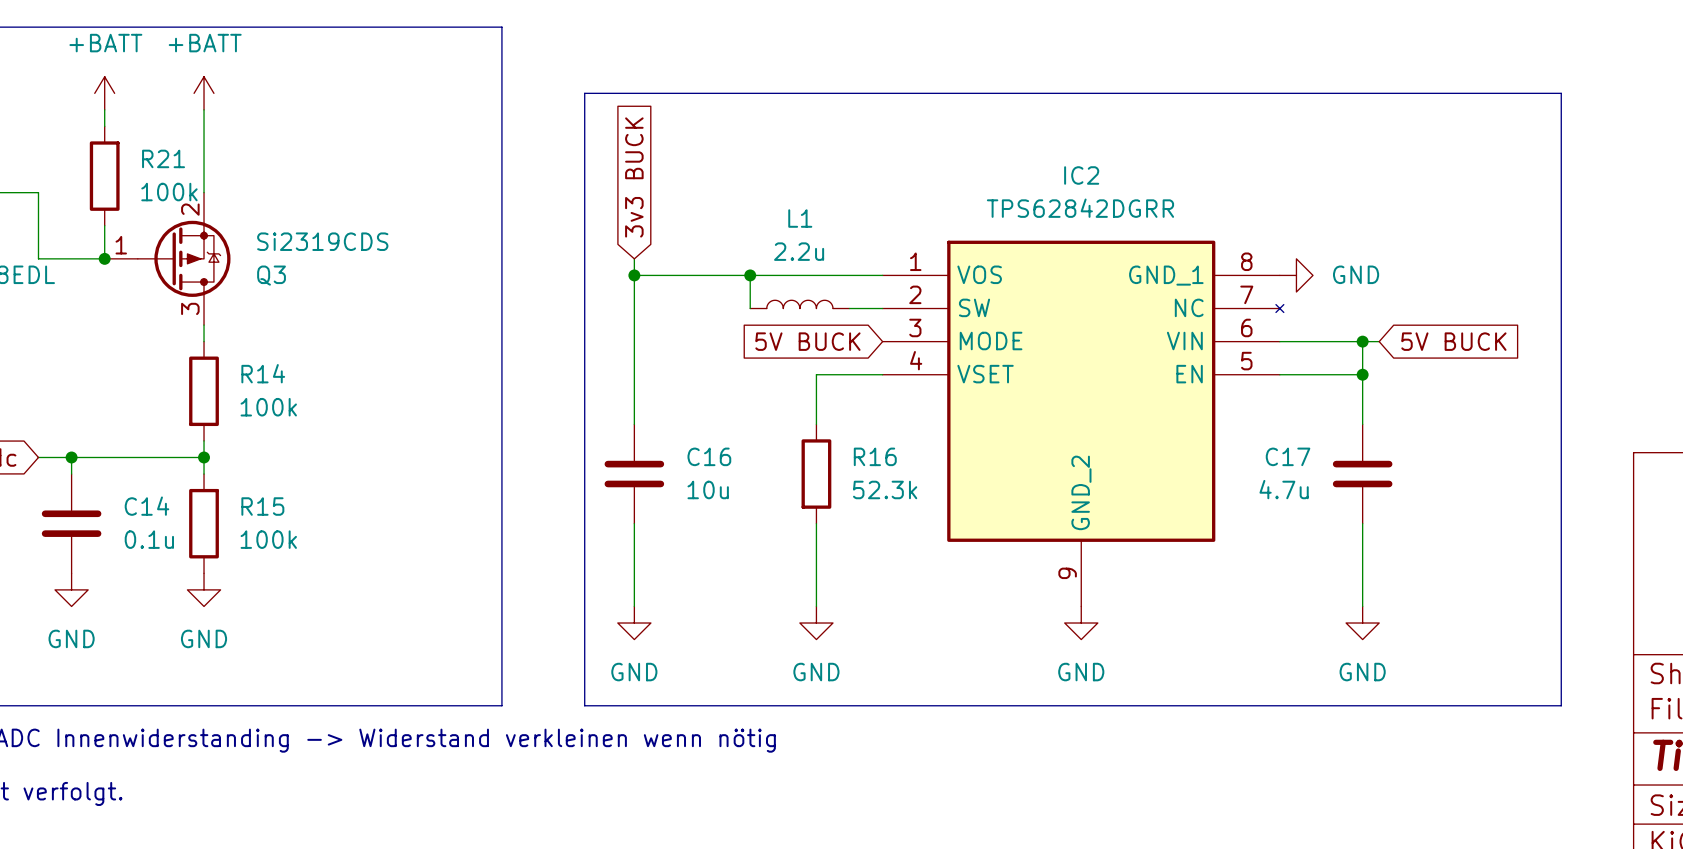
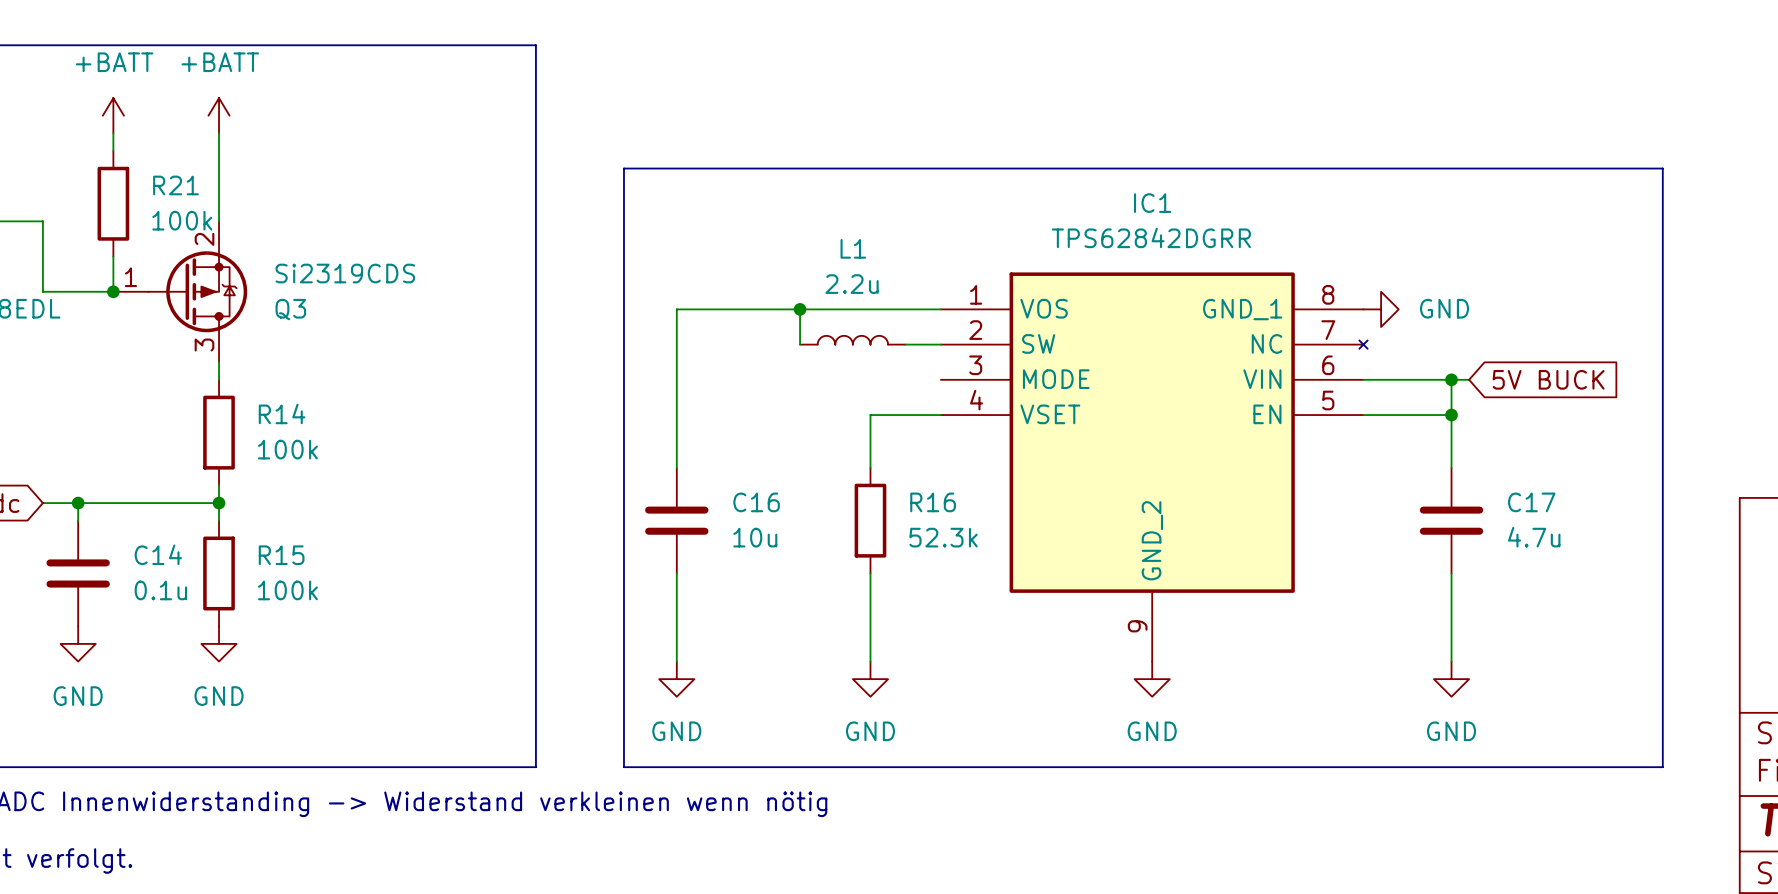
line: (584, 143) (584, 93) (1561, 93) (1561, 143) -> (623, 168) (1662, 168)
IC2 name: IC2 (1081, 175) -> IC1 (1152, 203)
global label: 3v3 BUCK (634, 177) -> none
wire: (634, 258) (634, 275) -> none
junction: (634, 275) -> none
global label: 5V BUCK (807, 341) -> none
C17 name position: C17 (1288, 456) -> C17 (1531, 502)
C17 value position: 4.7u (1284, 489) -> 4.7u (1534, 537)

